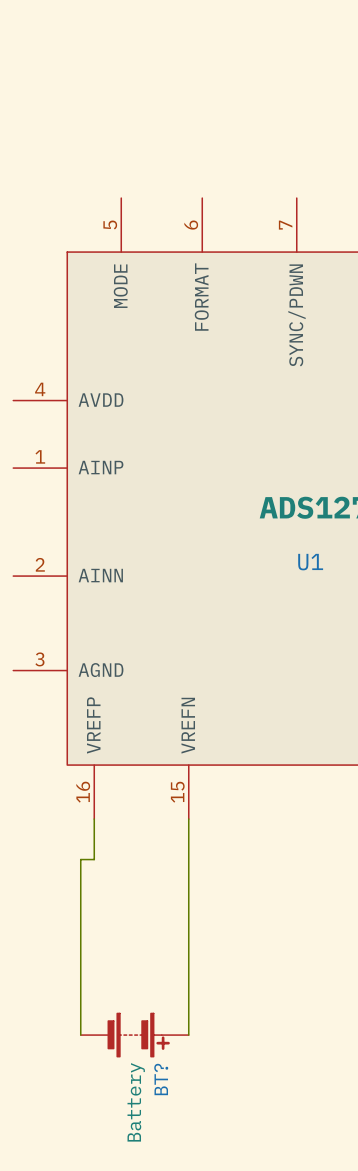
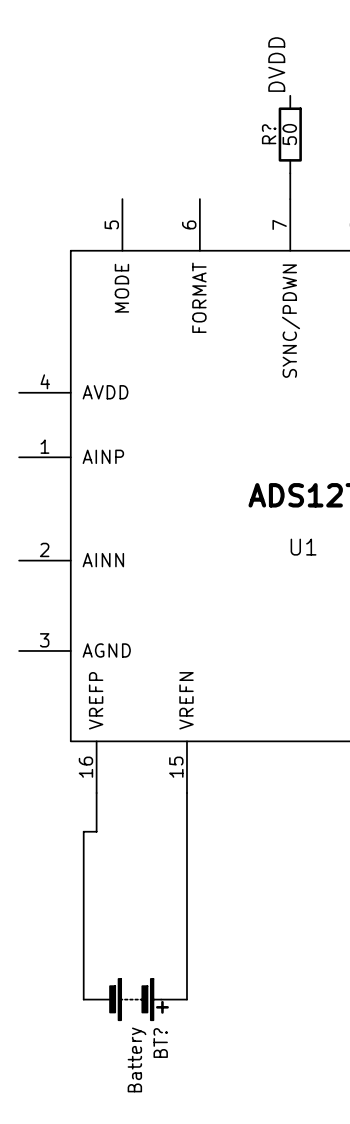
label: none -> DVDD (276, 64)
R?: none -> 50 (290, 134)
wire: none -> (290, 173) (290, 199)

